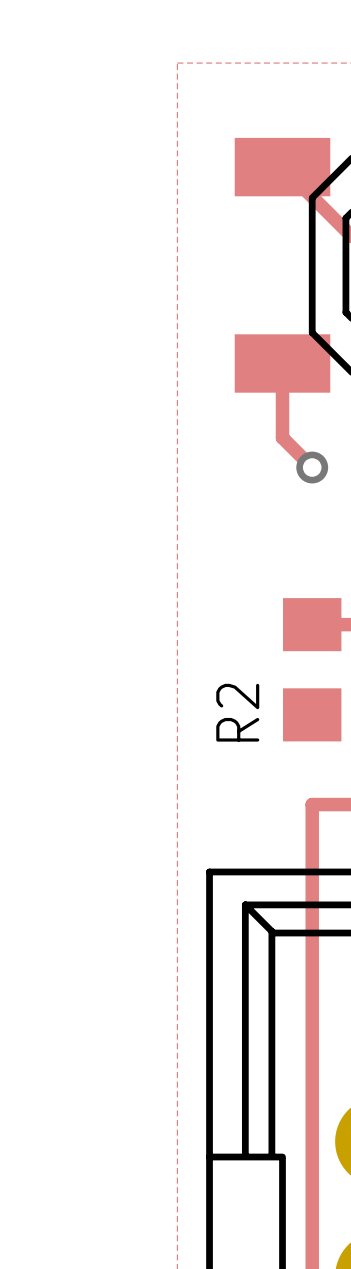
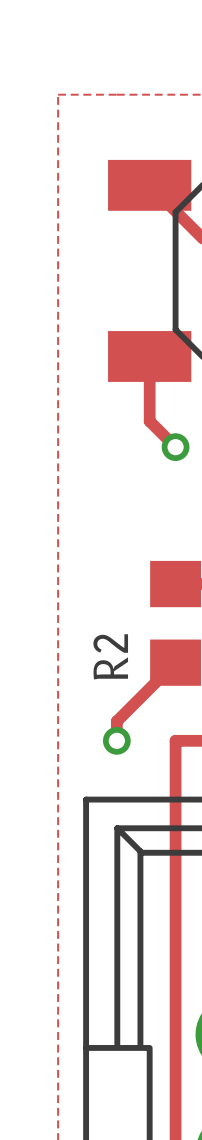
track: none -> (175, 662) (116, 721) (116, 740)
via: none -> (116, 740)

